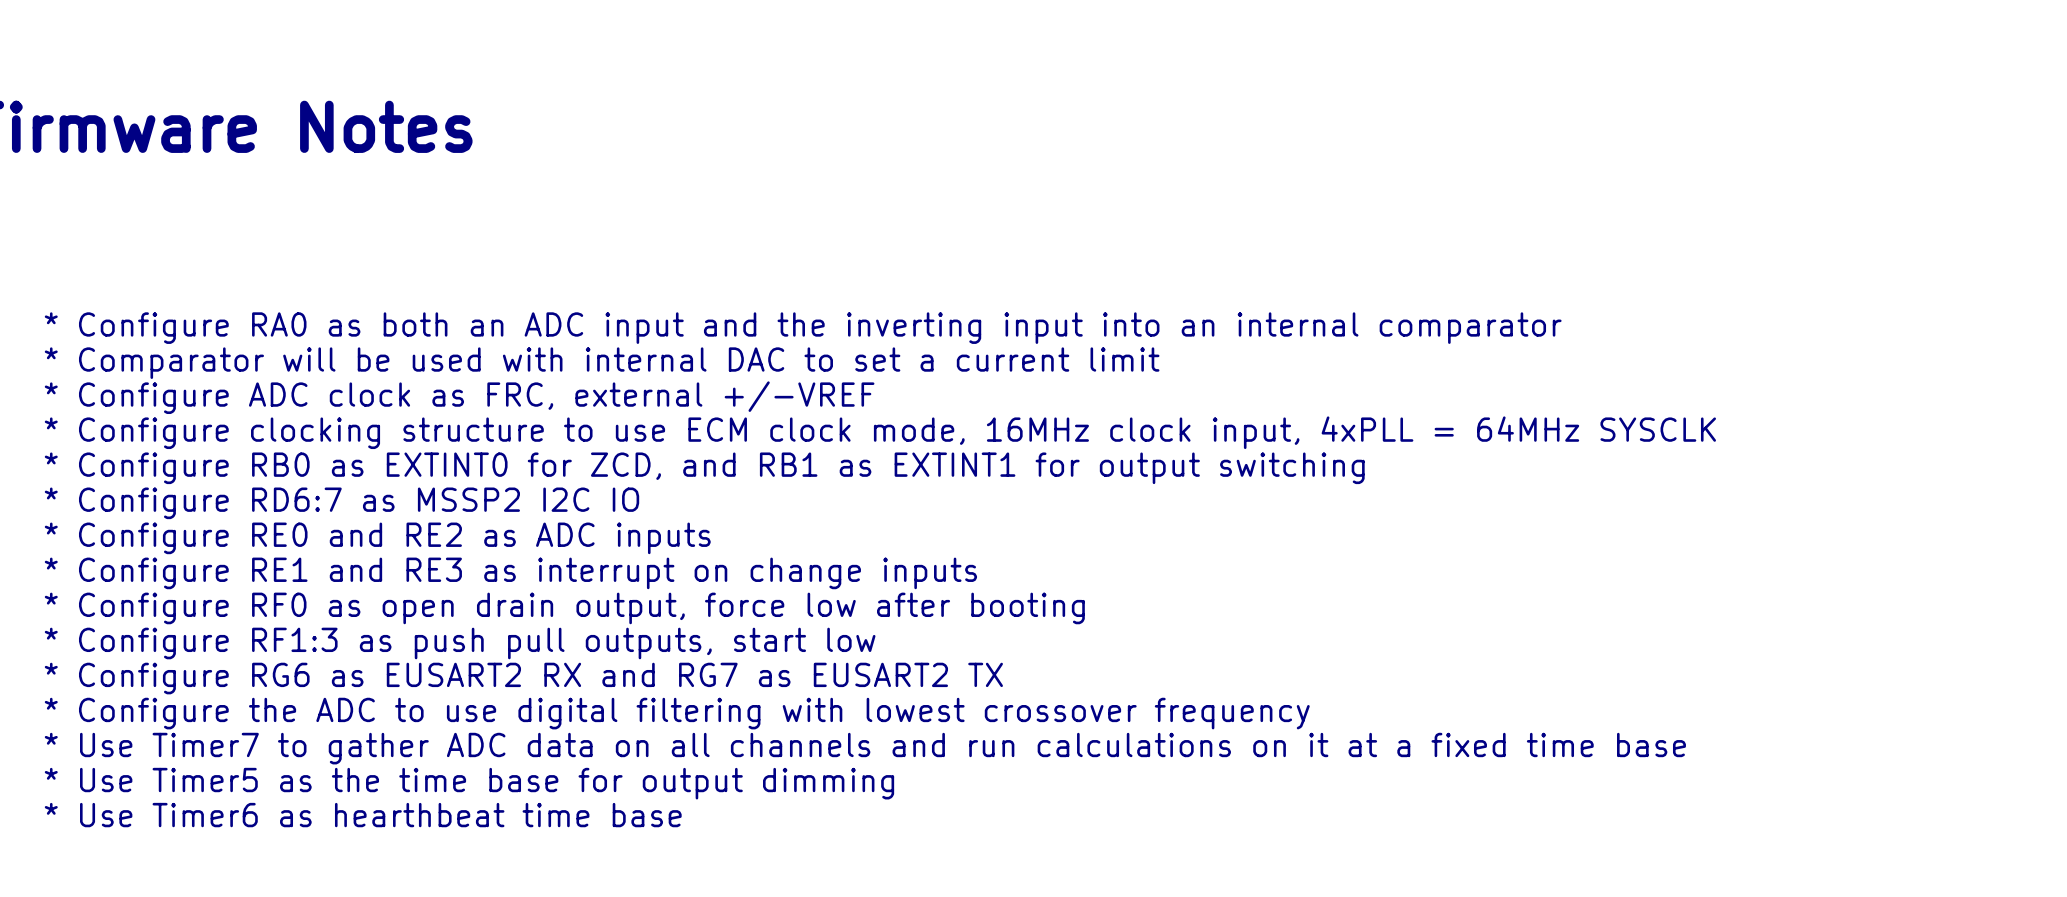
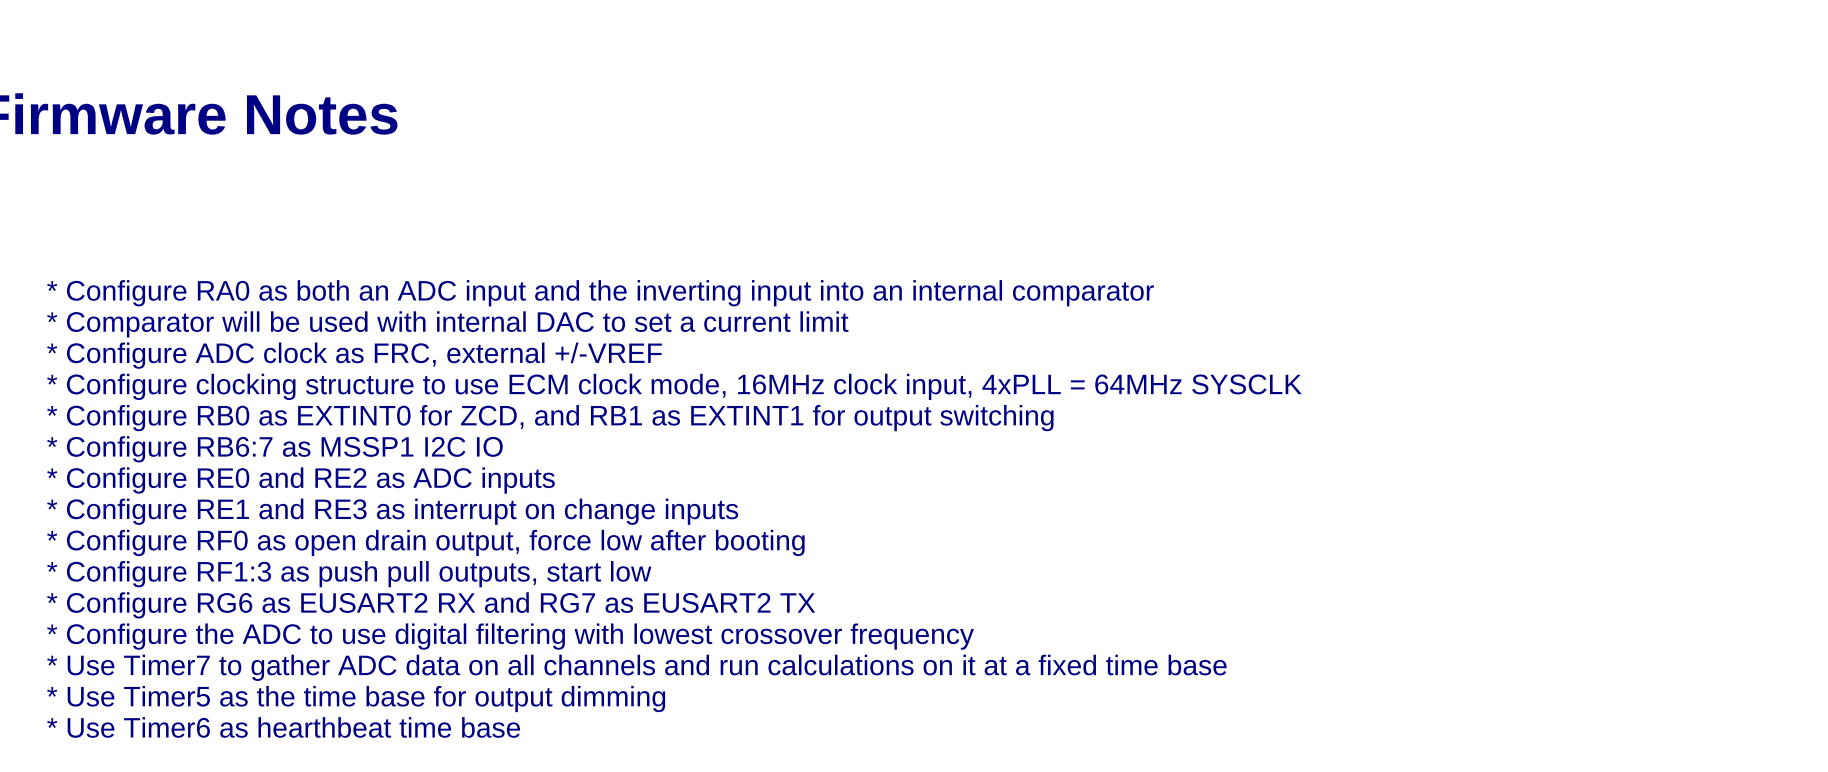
text: * Configure RD6:7 as MSSP2 I2C IO (341, 503) -> * Configure RB6:7 as MSSP1 I2C IO (274, 449)

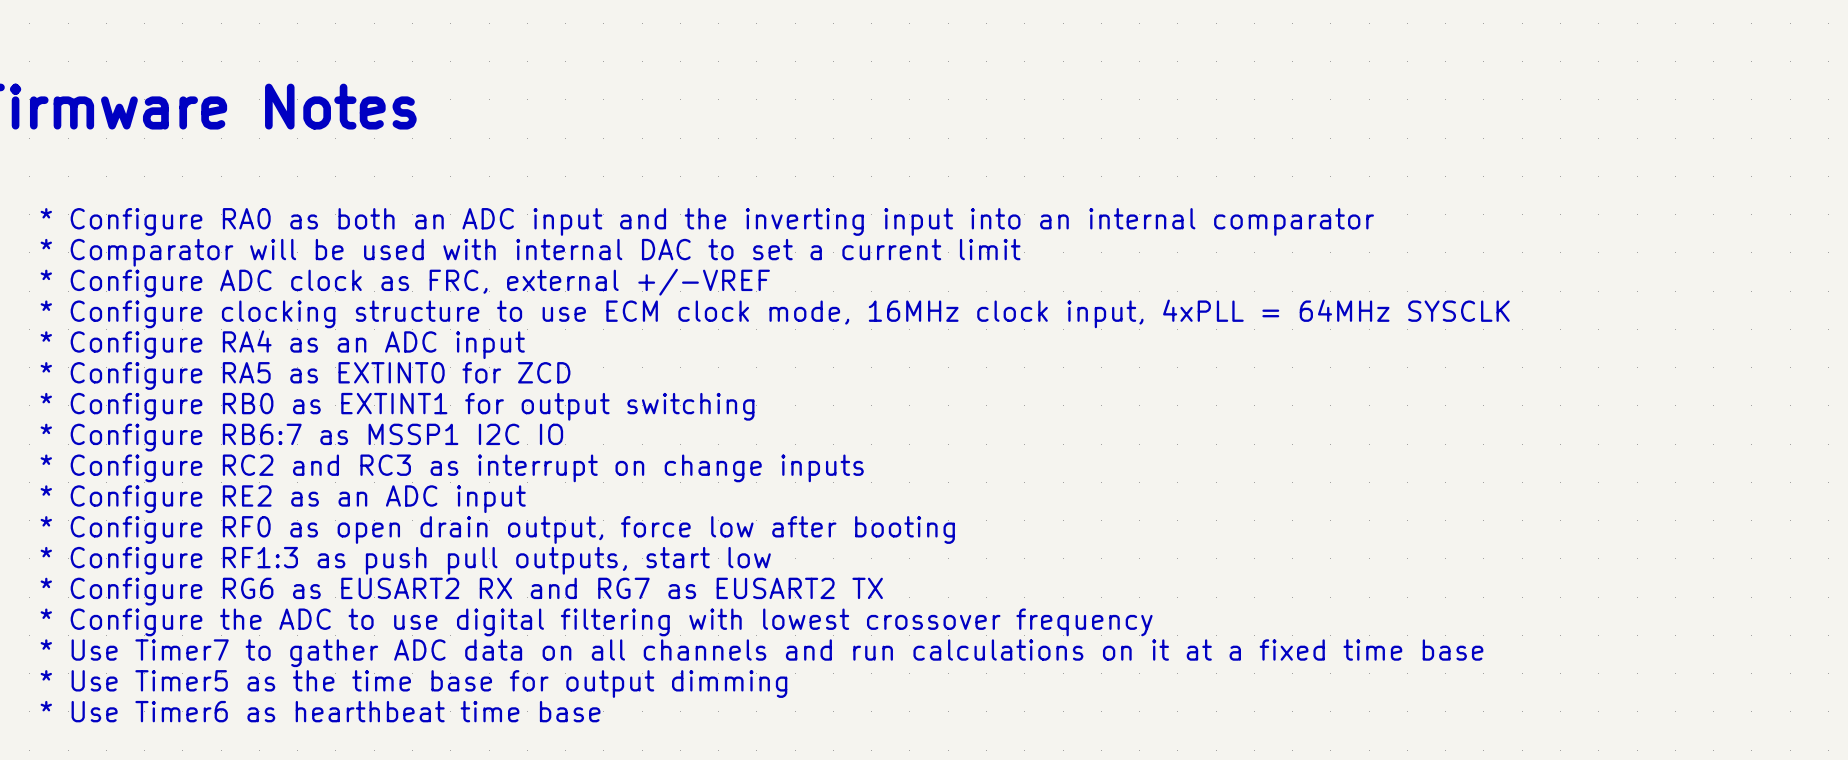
text: none -> * Configure RA0 as both an ADC input and the inverting input into an internal comparator (707, 221)
text: none -> * Comparator will be used with internal DAC to set a current limit (530, 252)
text: * Configure RA0 as both an ADC input and the inverting input into an internal comparator (600, 293) -> * Configure ADC clock as FRC, external +/-VREF (405, 283)
text: * Comparator will be used with internal DAC to set a current limit (447, 324) -> * Configure clocking structure to use ECM clock mode, 16MHz clock input, 4xPLL = 64MHz SYSCLK (775, 313)
text: * Configure ADC clock as FRC, external +/-VREF (354, 355) -> * Configure RA4 as an ADC input (282, 344)
text: * Configure clocking structure to use ECM clock mode, 16MHz clock input, 4xPLL = 64MHz SYSCLK (674, 386) -> * Configure RA5 as EXTINT0 for ZCD (305, 375)
text: * Configure RB0 as EXTINT0 for ZCD, and RB1 as EXTINT1 for output switching (550, 418) -> * Configure RB0 as EXTINT1 for output switching (397, 406)
text: * Configure RE0 and RE2 as ADC inputs (300, 480) -> * Configure RC2 and RC3 as interrupt on change inputs (452, 468)
text: * Configure RE1 and RE3 as interrupt on change inputs (392, 511) -> * Configure RE2 as an ADC input (283, 499)

